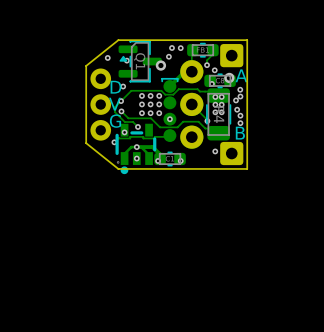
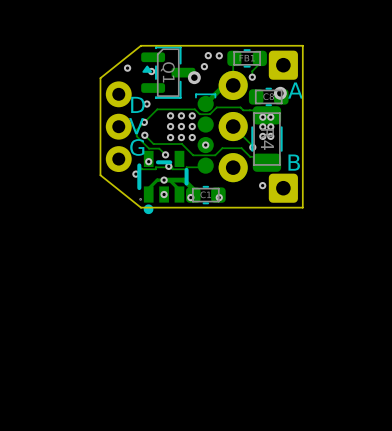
via: (214, 70) -> none
via: (211, 83) -> none
via: (240, 89) -> none
via: (240, 96) -> none
via: (236, 100) -> none
via: (237, 109) -> none
via: (240, 115) -> none
via: (240, 123) -> none
via: none -> (168, 166)

